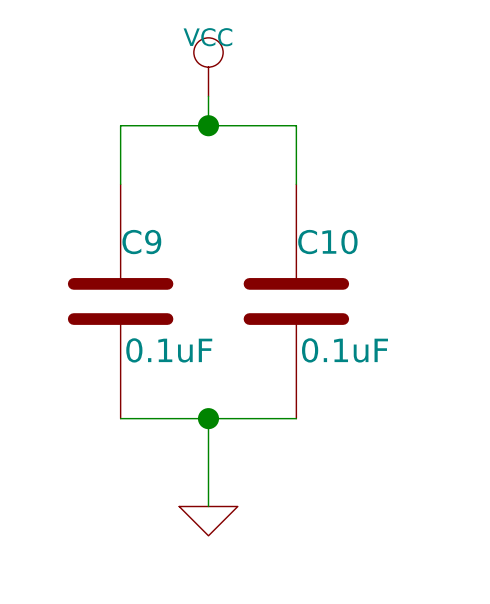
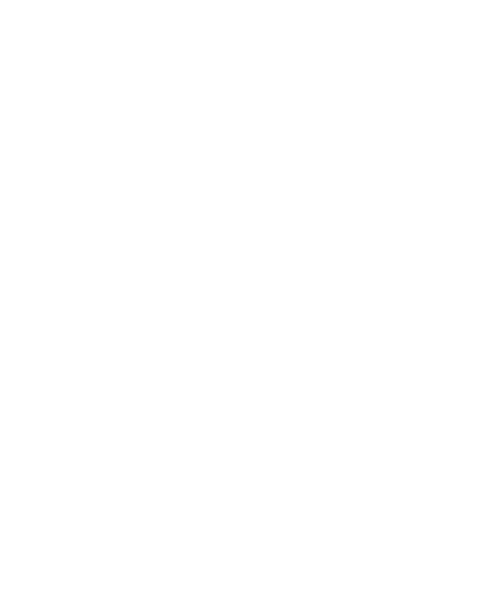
power symbol: VCC (208, 67) -> none
wire: (208, 96) (208, 125) -> none
junction: (208, 125) -> none
wire: (120, 184) (120, 125) (296, 125) (296, 184) -> none
C9: 0.1uF (120, 301) -> none
C10: 0.1uF (296, 301) -> none
wire: (120, 418) (296, 418) -> none
wire: (208, 418) (208, 506) -> none
junction: (208, 418) -> none
power symbol: (208, 521) -> none

